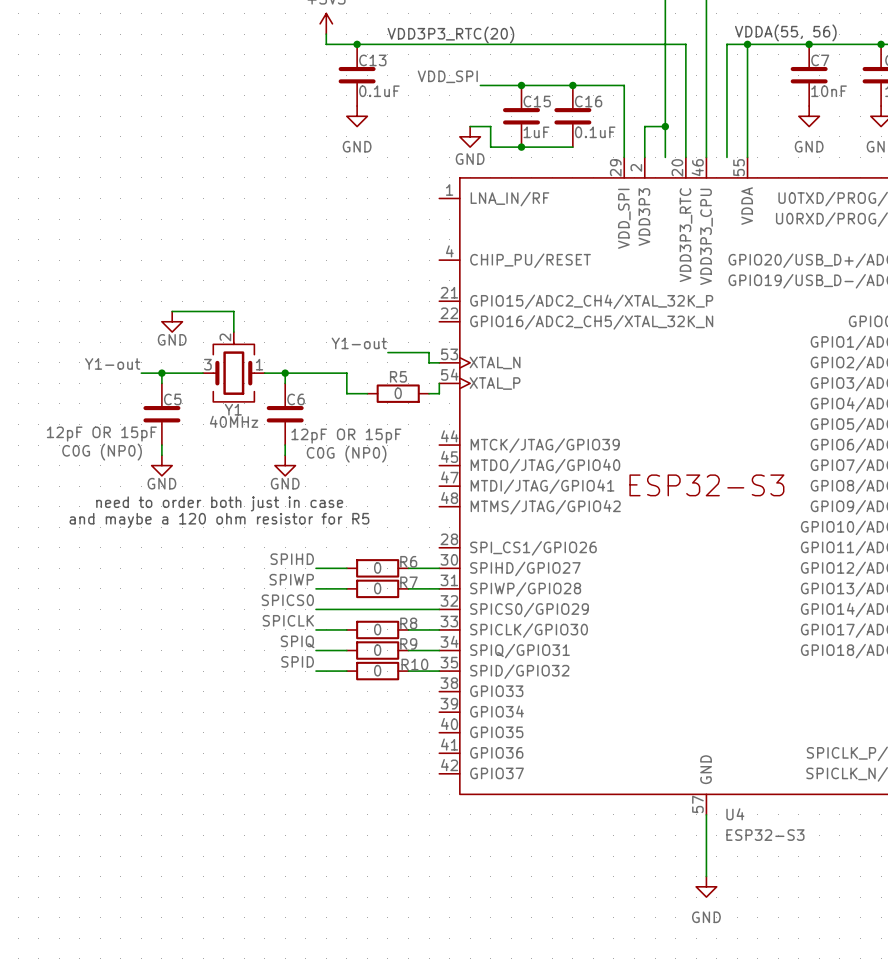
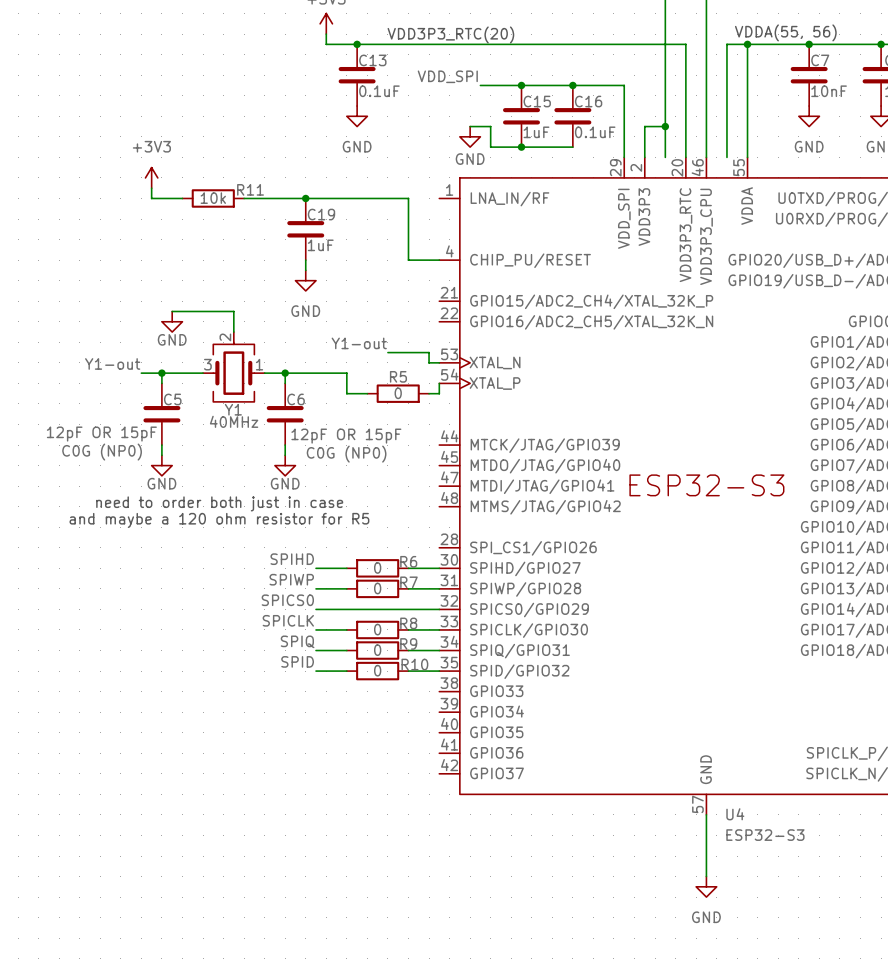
power symbol: none -> +3V3 (151, 177)
wire: none -> (151, 188) (151, 198) (182, 198)
R11: none -> 10k (213, 198)
wire: none -> (244, 198) (408, 198) (408, 260) (439, 260)
junction: none -> (305, 198)
C19: none -> 1uF (305, 229)
wire: none -> (305, 260) (305, 270)
power symbol: none -> GND (305, 280)

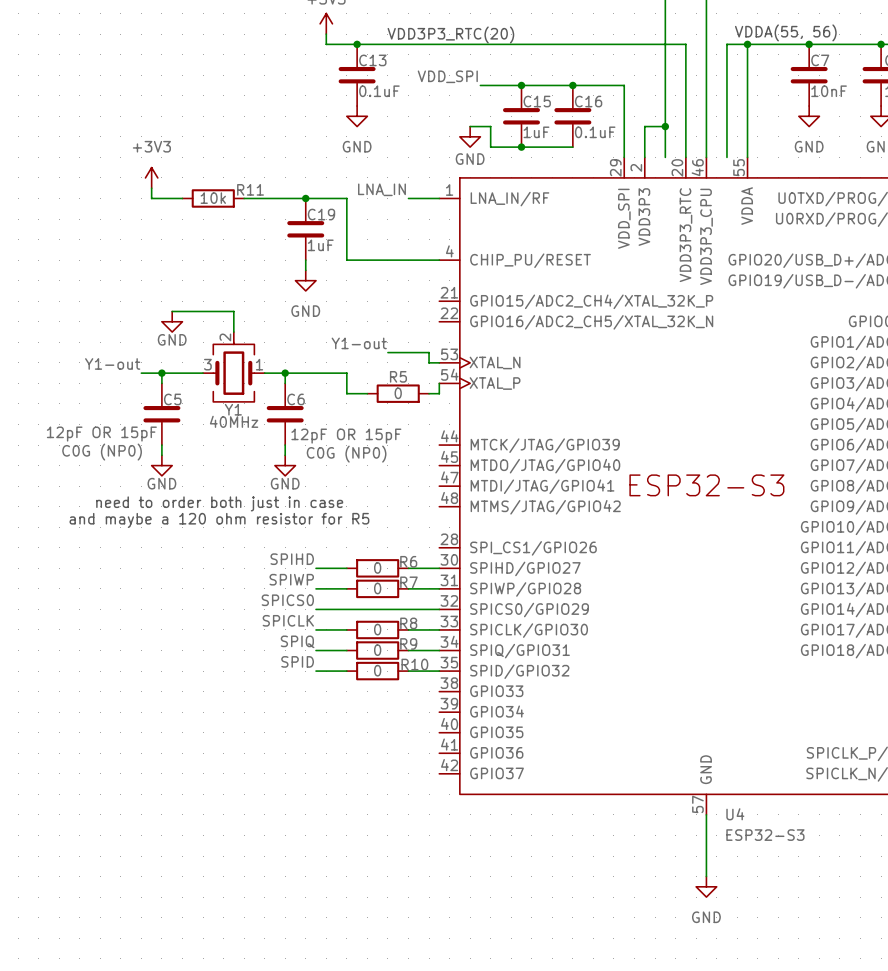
label: none -> LNA_IN (381, 189)
wire: (346, 198) (408, 198) (408, 260) -> (346, 198) (346, 260) (408, 260)
wire: none -> (408, 198) (439, 198)

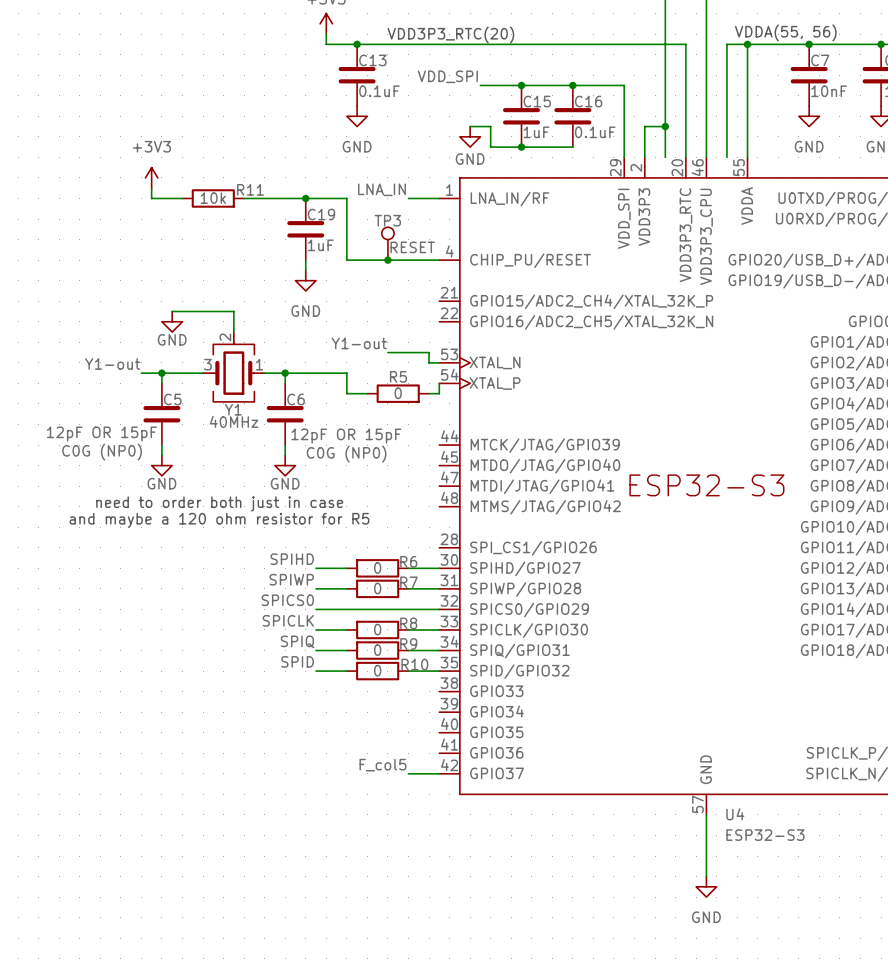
TP3: none -> RESET (387, 243)
junction: none -> (387, 260)
label: none -> F_col5 (382, 765)
wire: none -> (408, 773) (439, 773)

